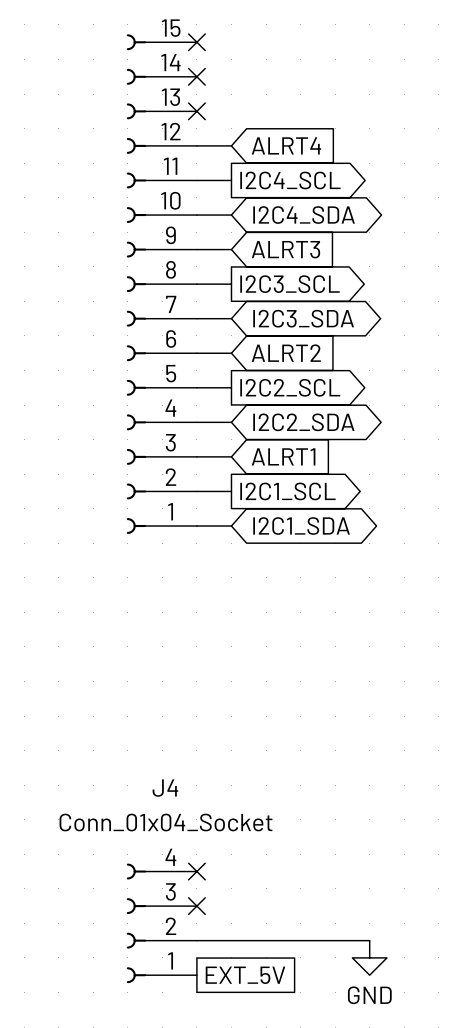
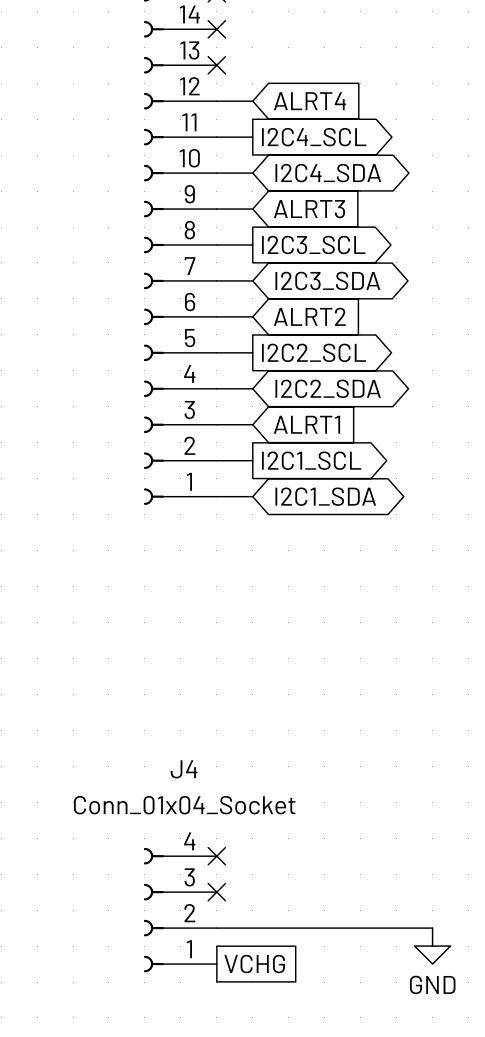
wire: none -> (396, 928) (432, 928)
power symbol position: GND (369, 957) -> GND (432, 946)
global label: EXT_5V (245, 975) -> VCHG (254, 964)

